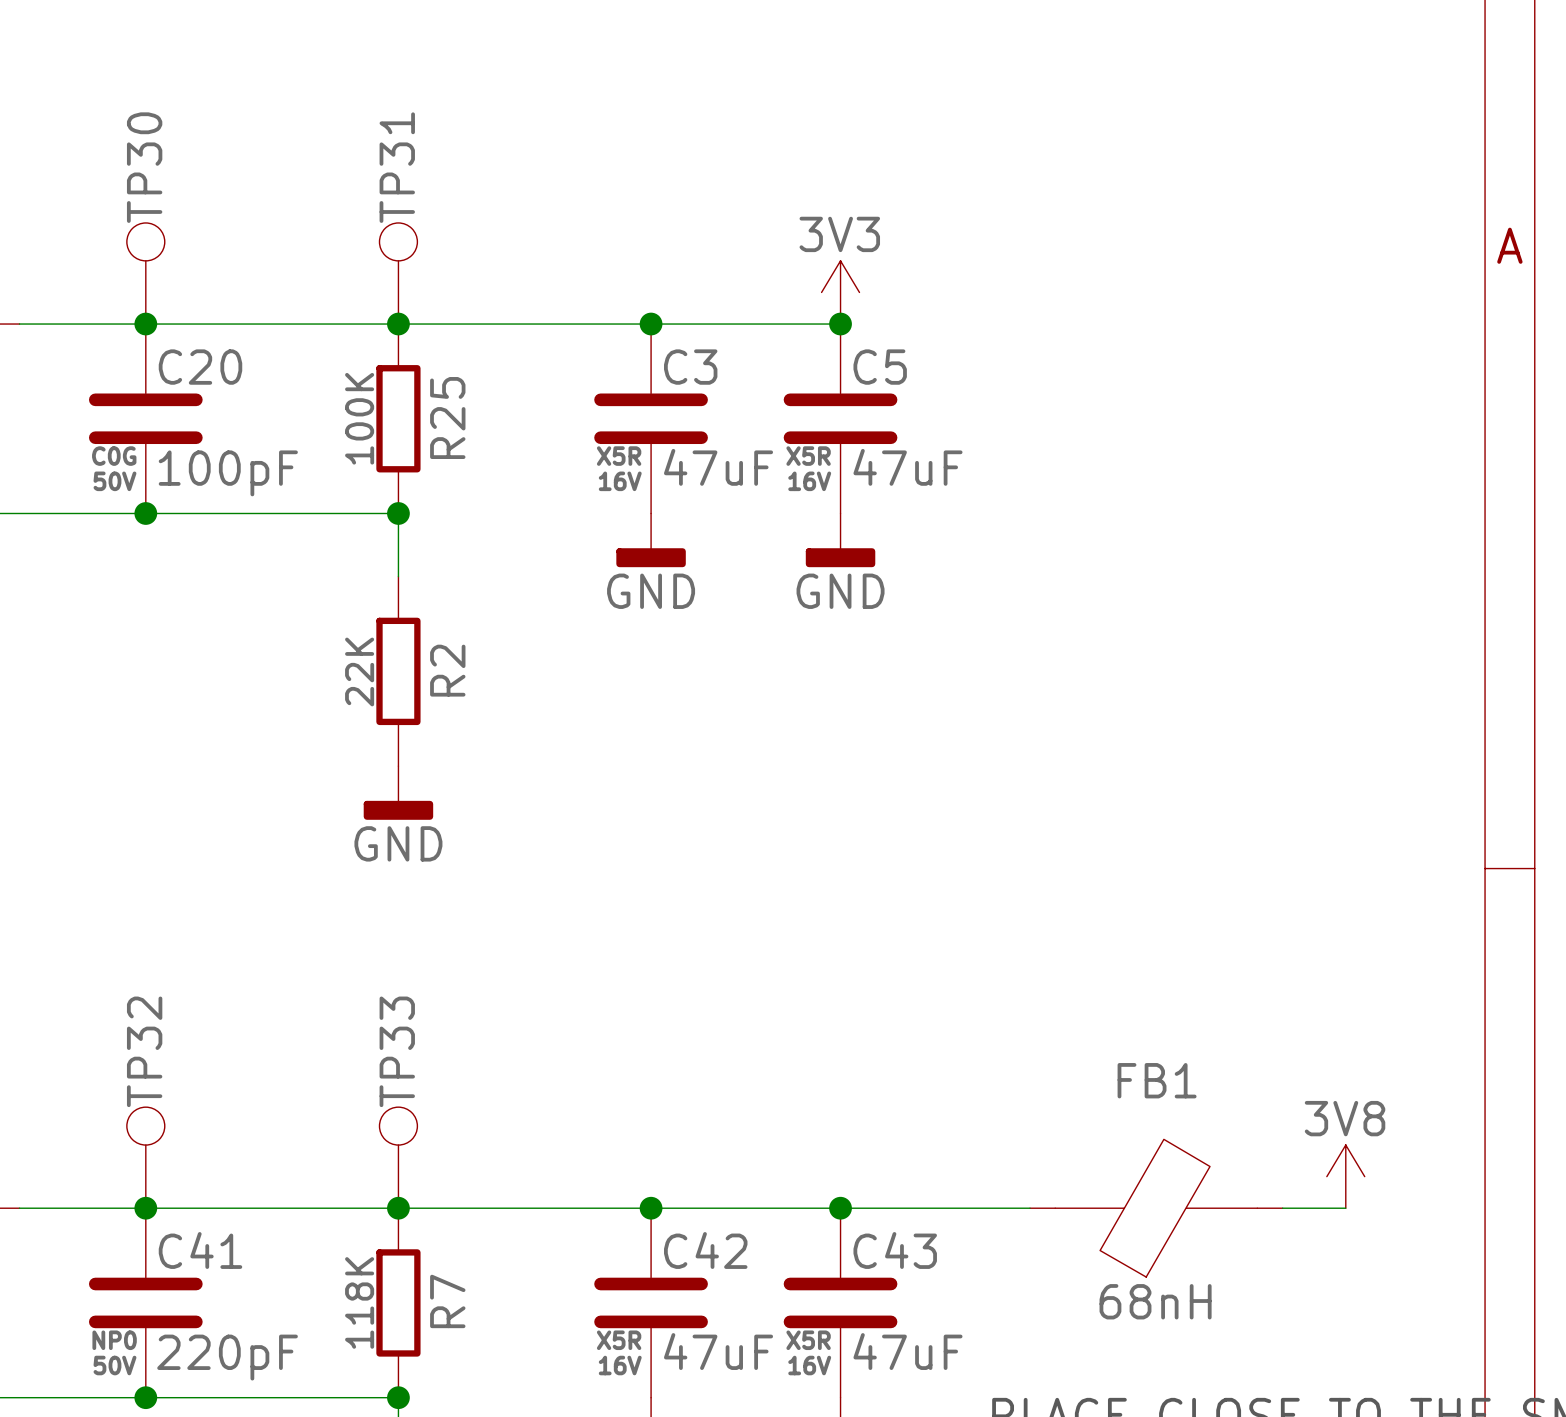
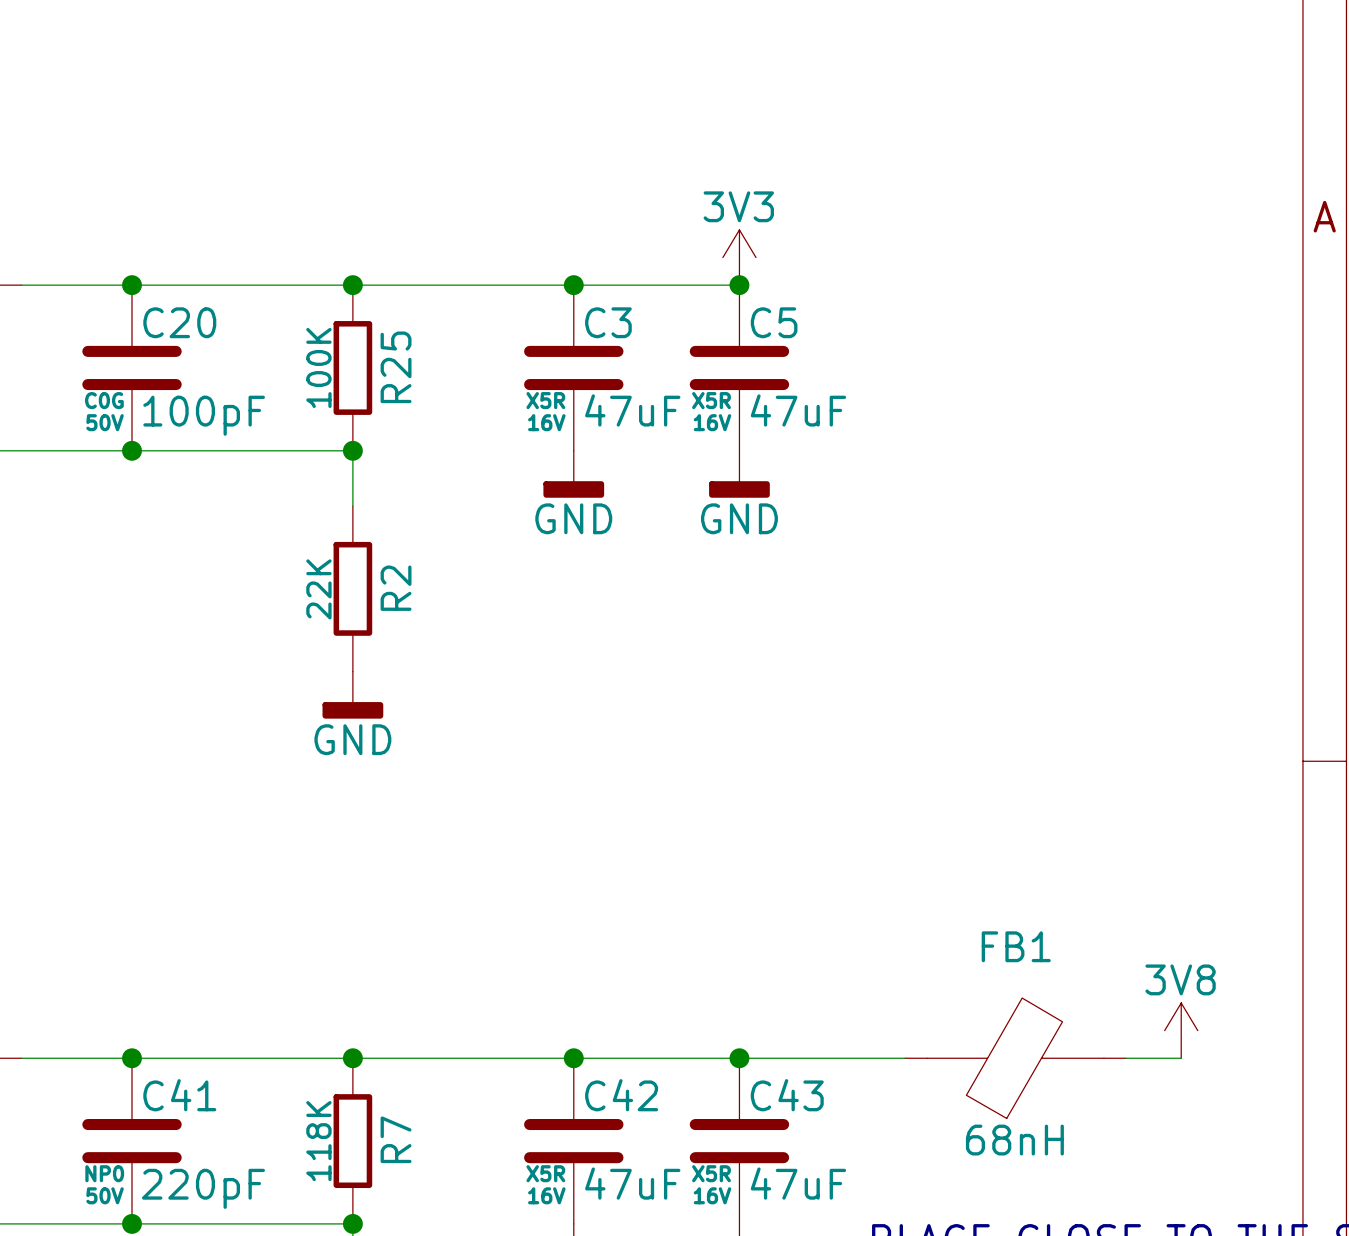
TP30: (145, 273) -> none
TP31: (398, 273) -> none
TP32: (145, 1157) -> none
TP33: (398, 1157) -> none

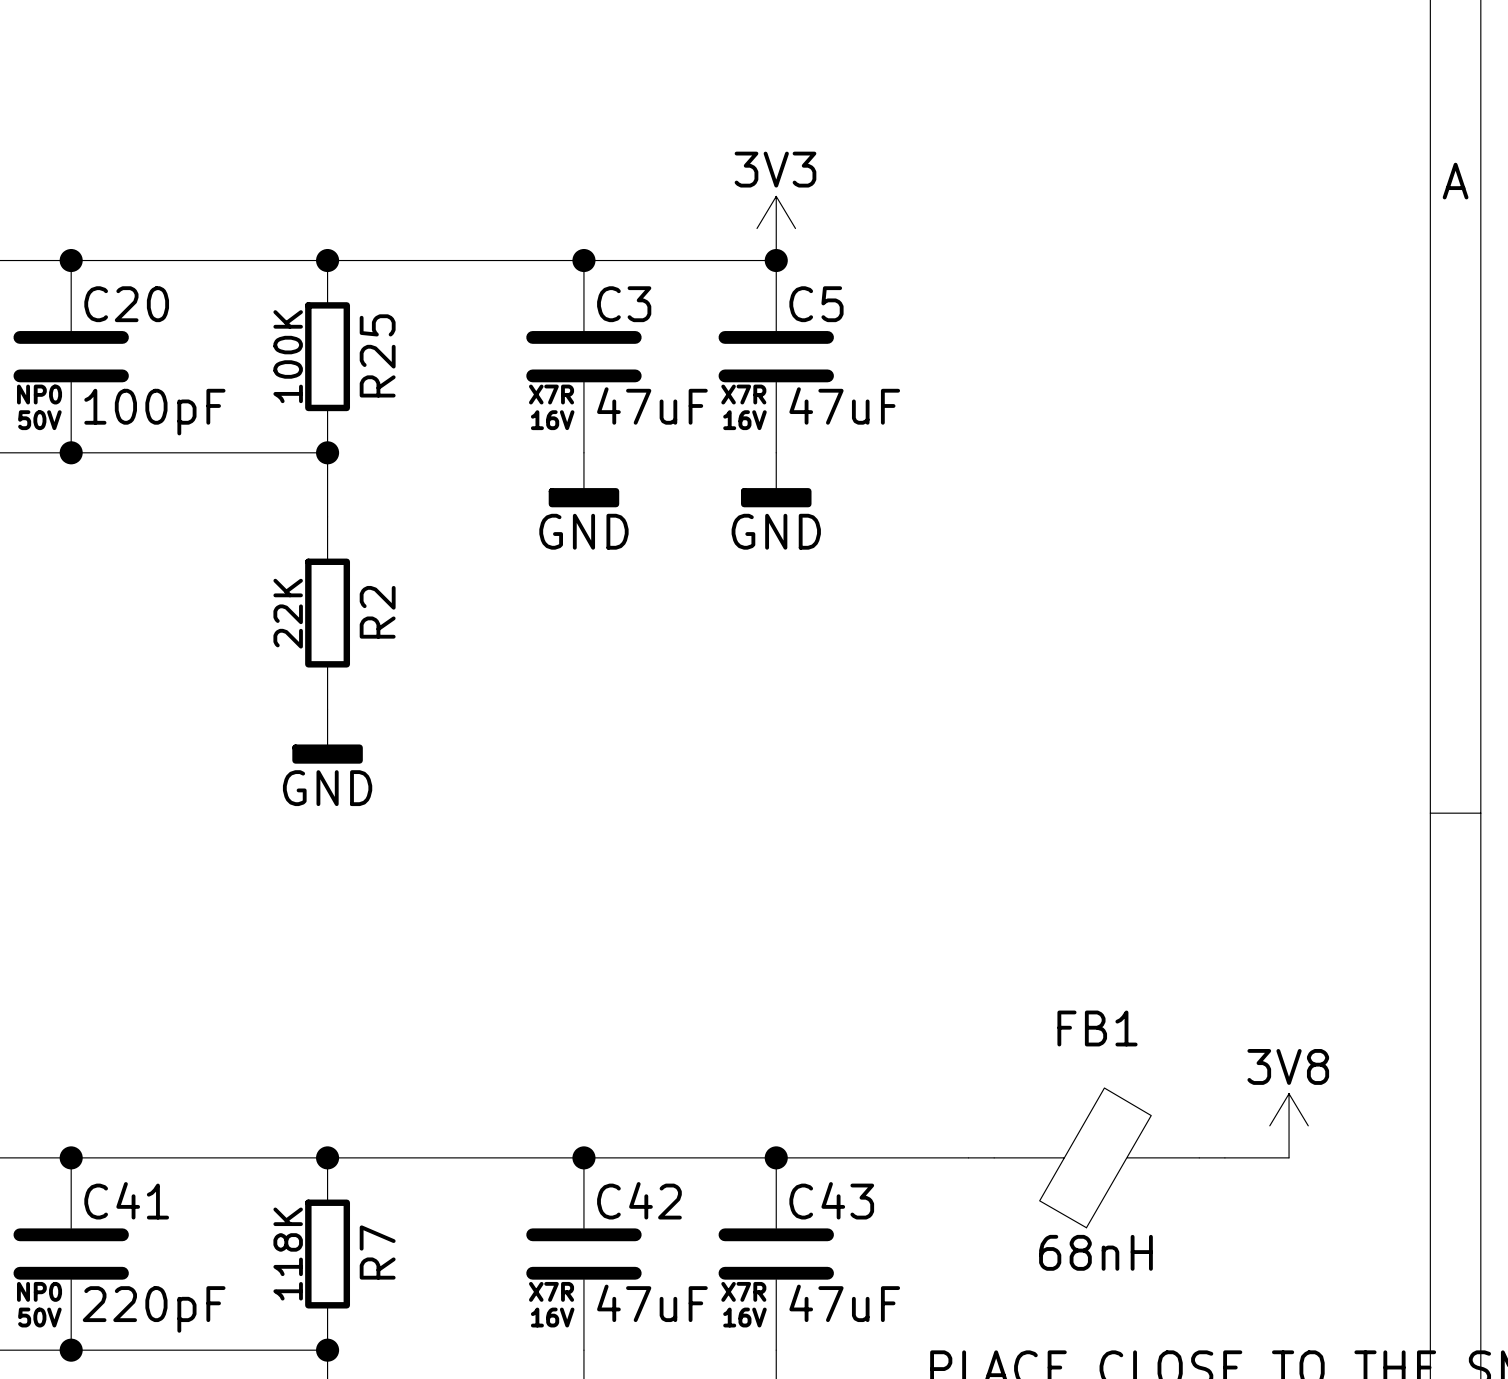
C20 text: C0G (104, 400) -> NP0 (39, 394)
C3 text: X5R (545, 400) -> X7R (551, 394)
C5 text: X5R (711, 400) -> X7R (743, 394)
C42 text: X5R (545, 1173) -> X7R (551, 1291)
C43 text: X5R (711, 1173) -> X7R (743, 1291)

